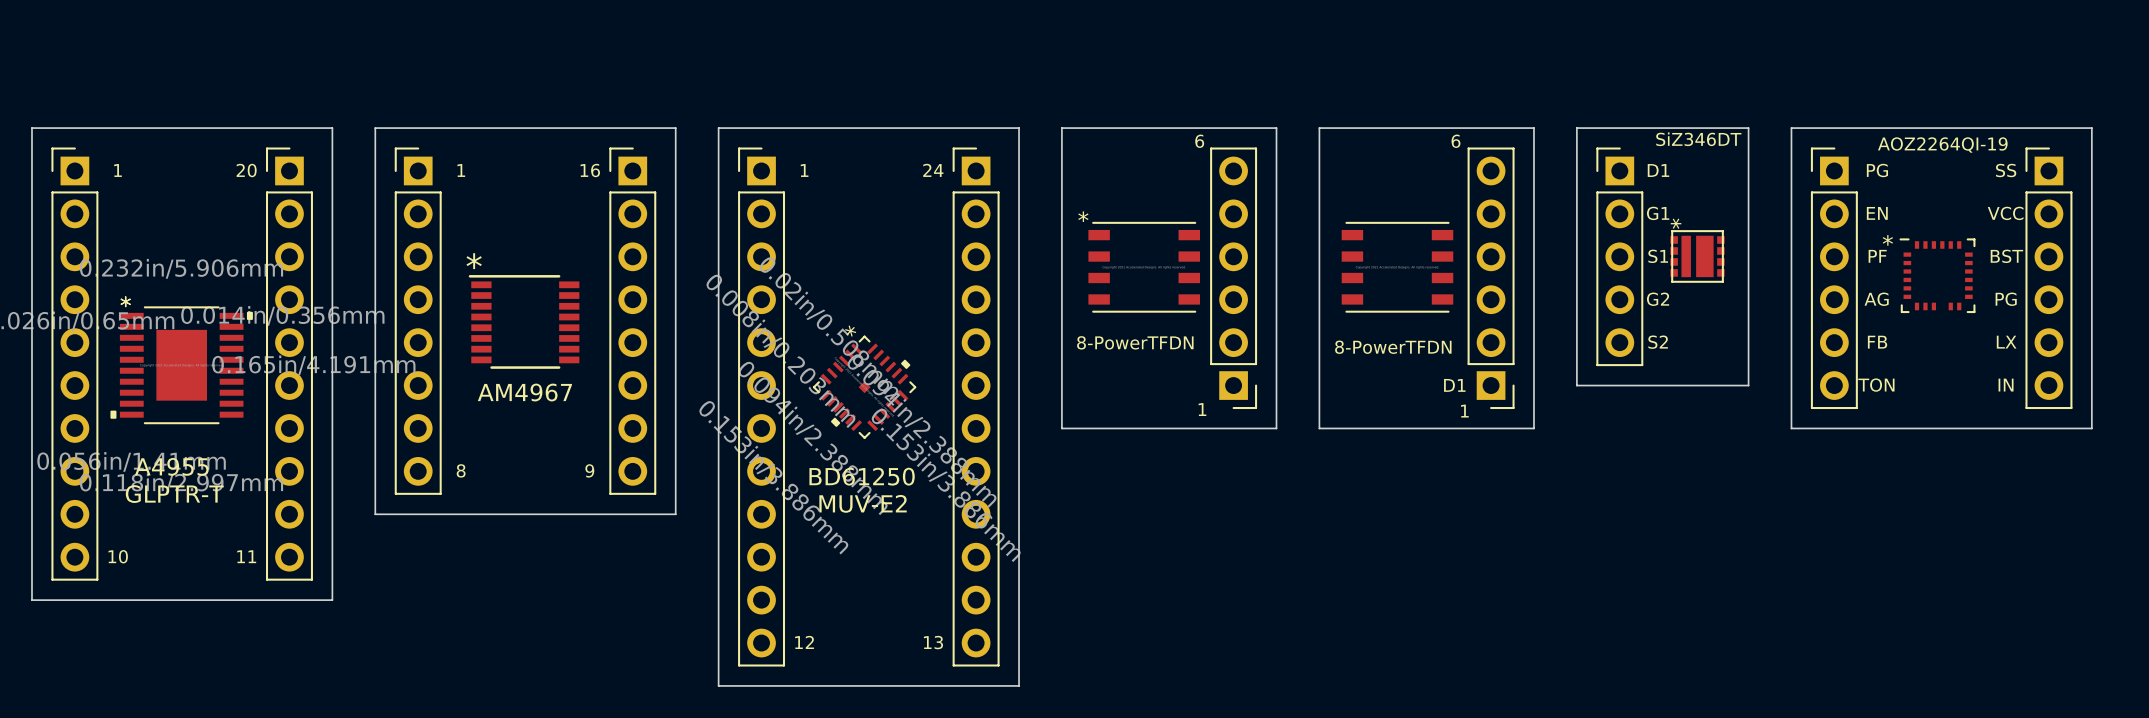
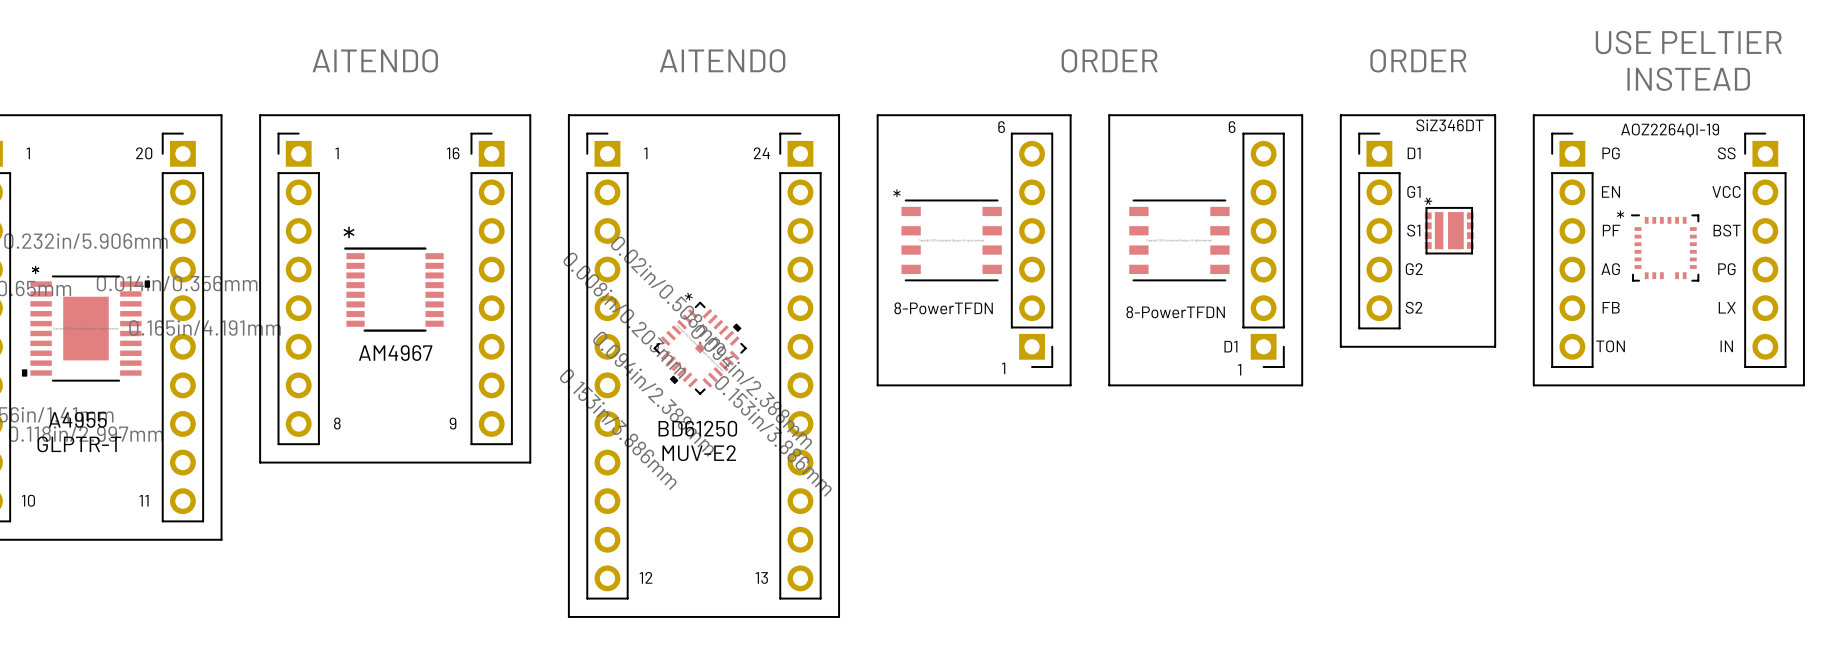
text: none -> USE PELTIER (1688, 42)
text: none -> AITENDO (375, 60)
text: none -> AITENDO (722, 60)
text: none -> ORDER (1109, 60)
text: none -> ORDER (1418, 60)
text: none -> INSTEAD (1688, 79)

